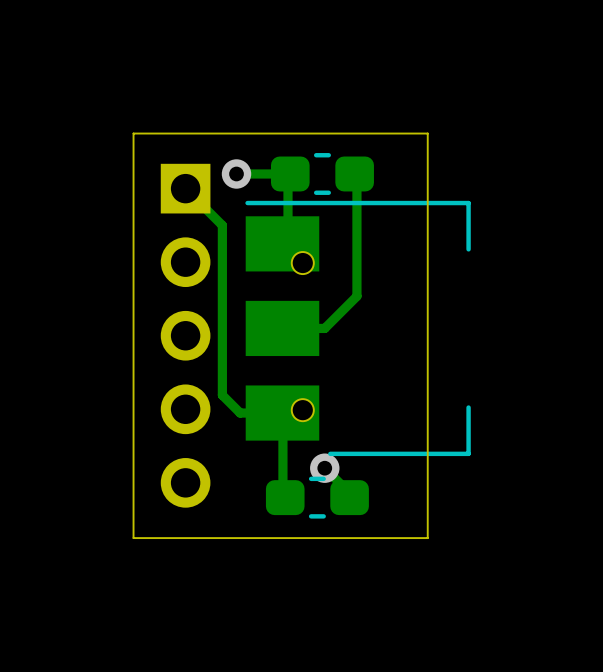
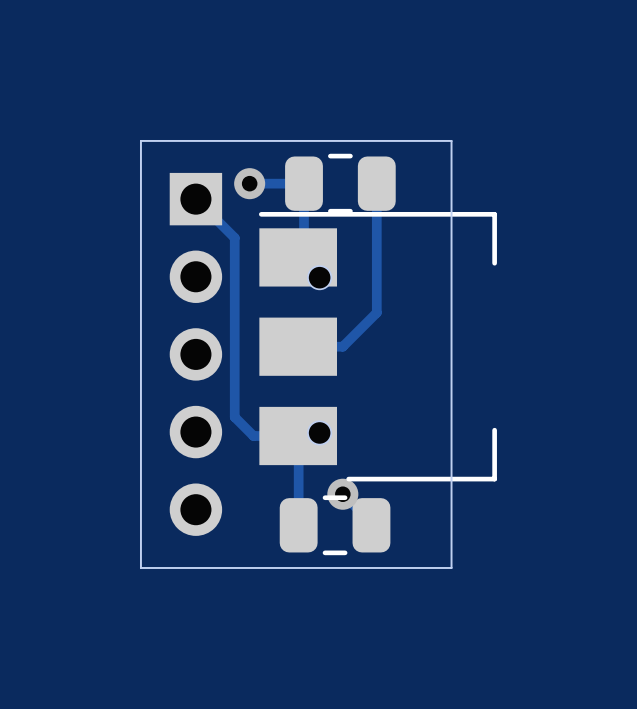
part footprint: [270, 153, 374, 195] -> [285, 153, 396, 214]
part footprint: [265, 476, 369, 519] -> [279, 495, 391, 556]

